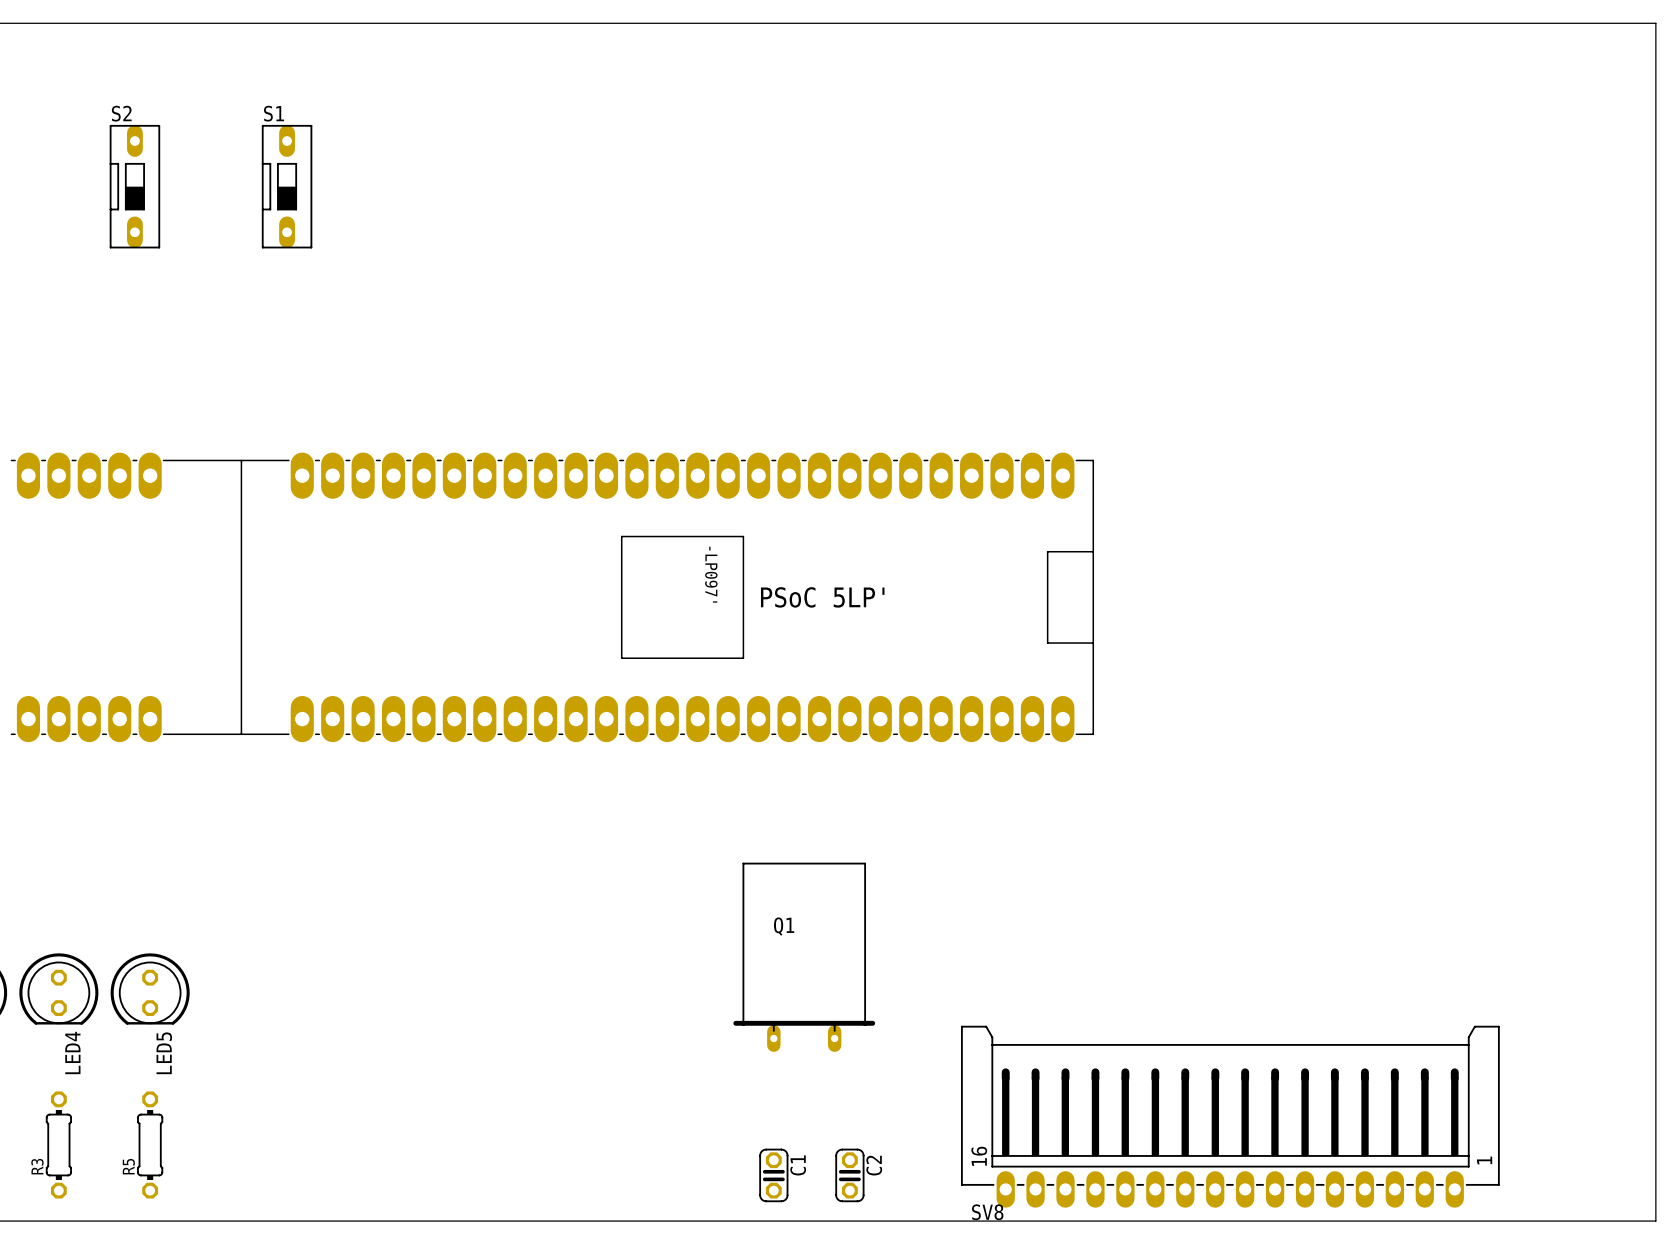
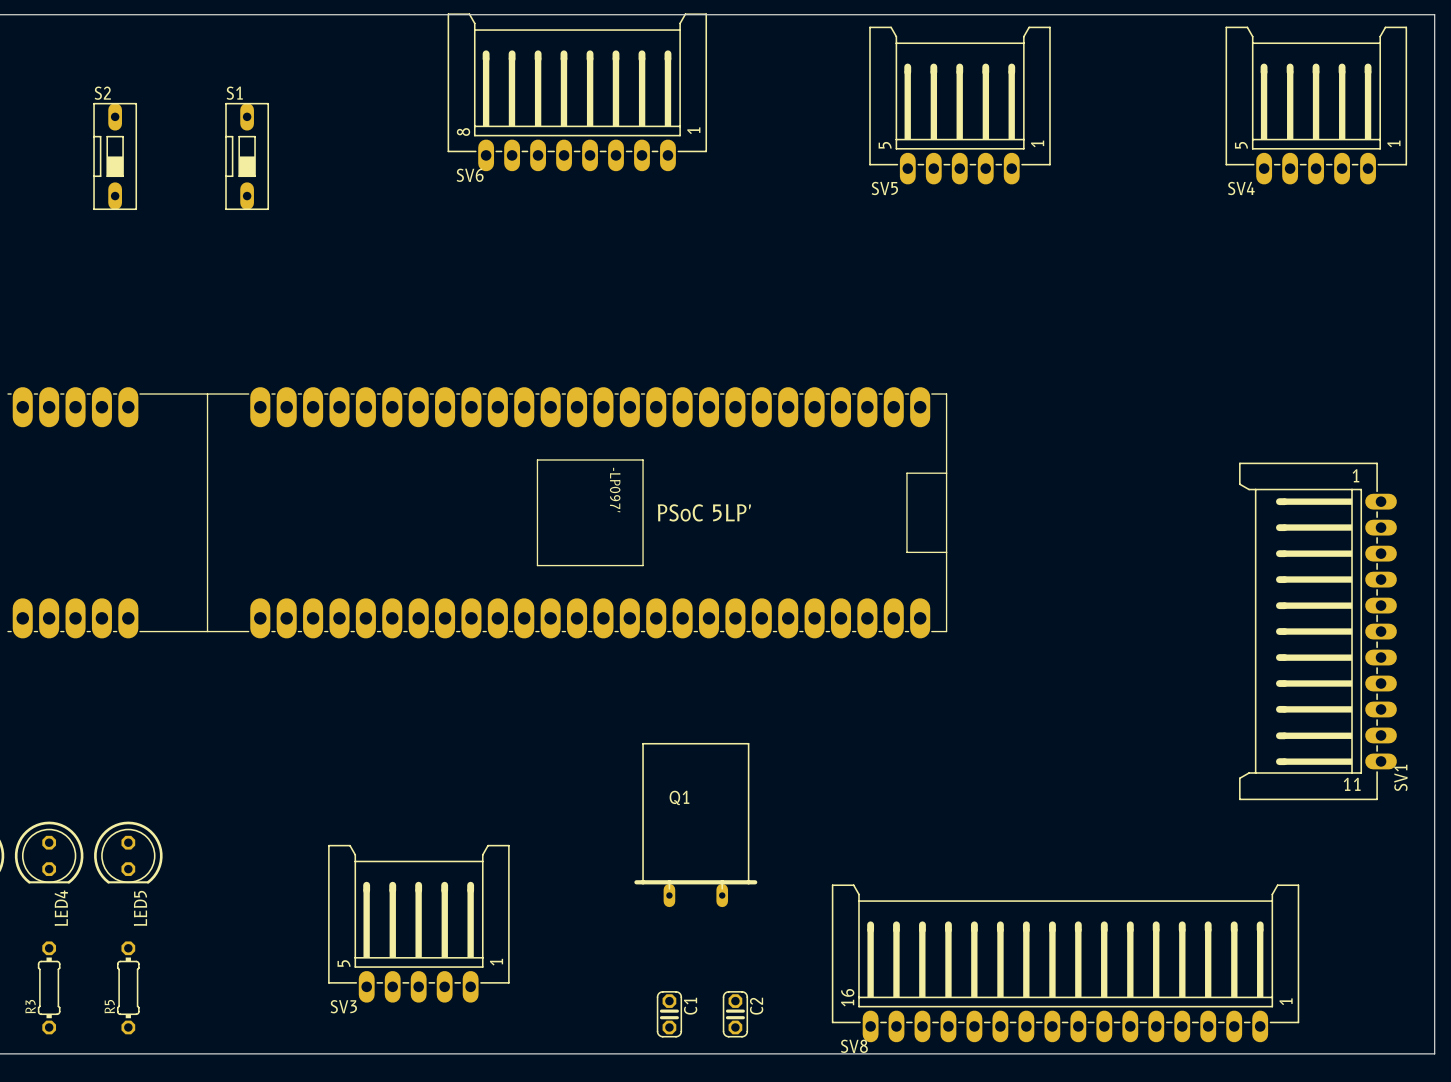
SV6: none -> (577, 92)
SV5: none -> (959, 105)
SV4: none -> (1316, 105)
SV1: none -> (1317, 631)
SV3: none -> (418, 923)

